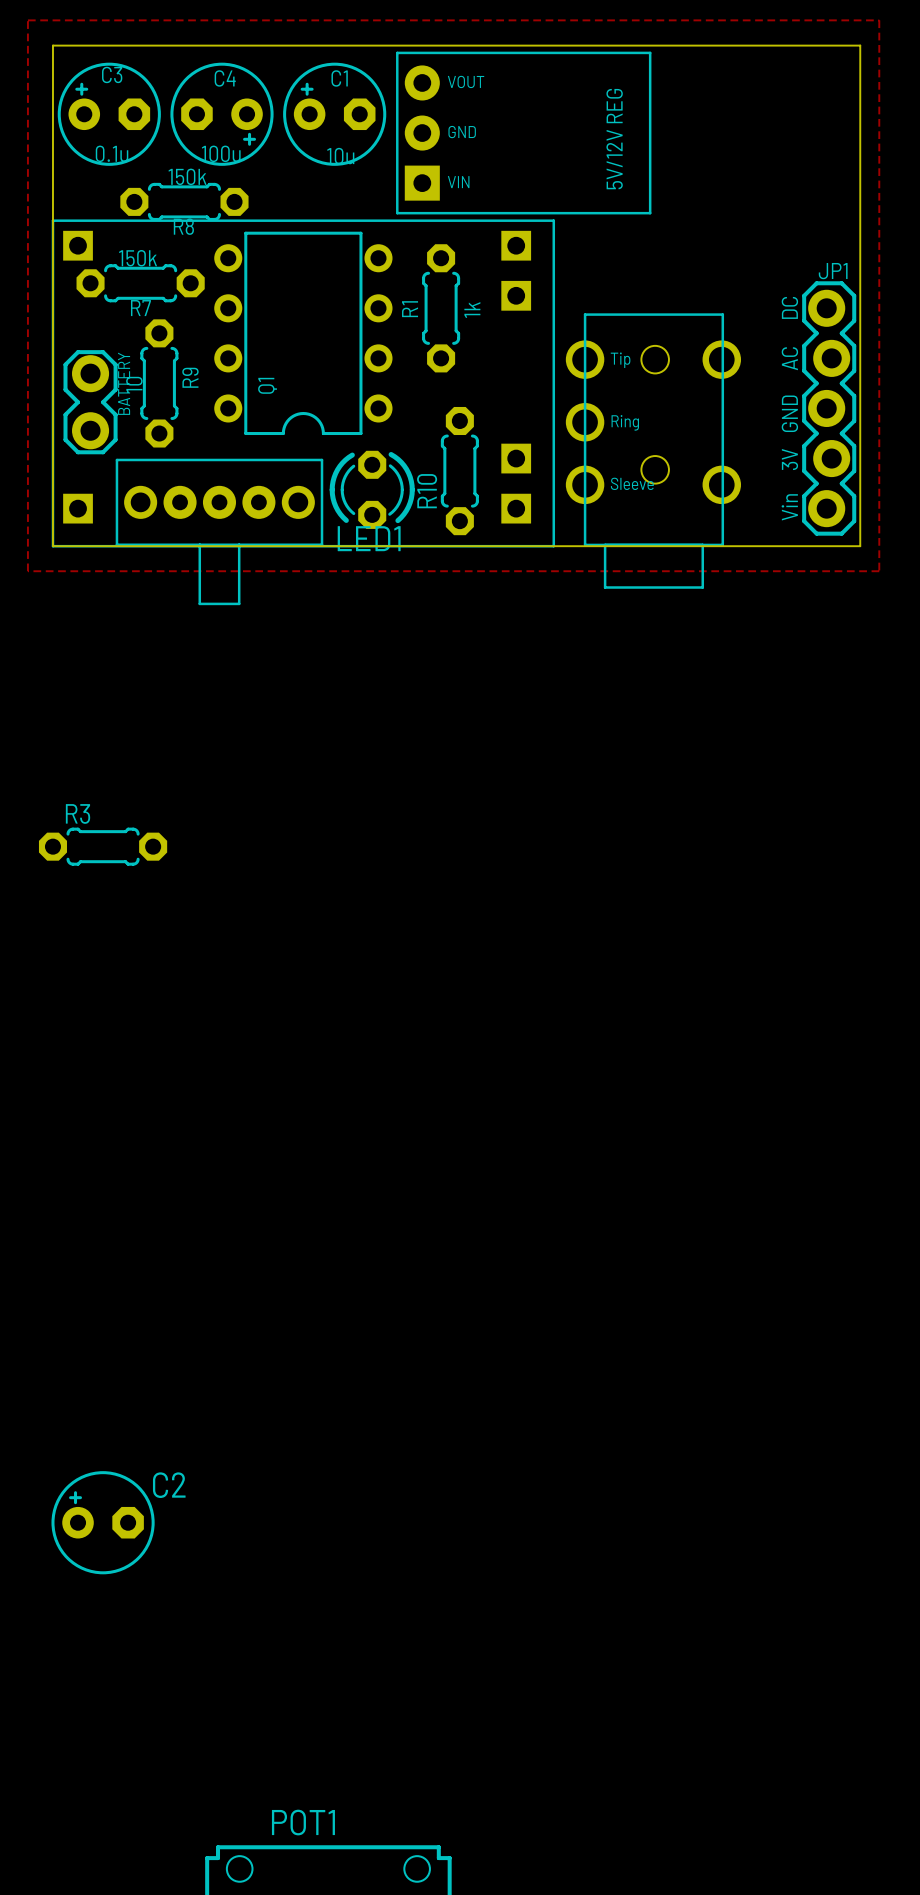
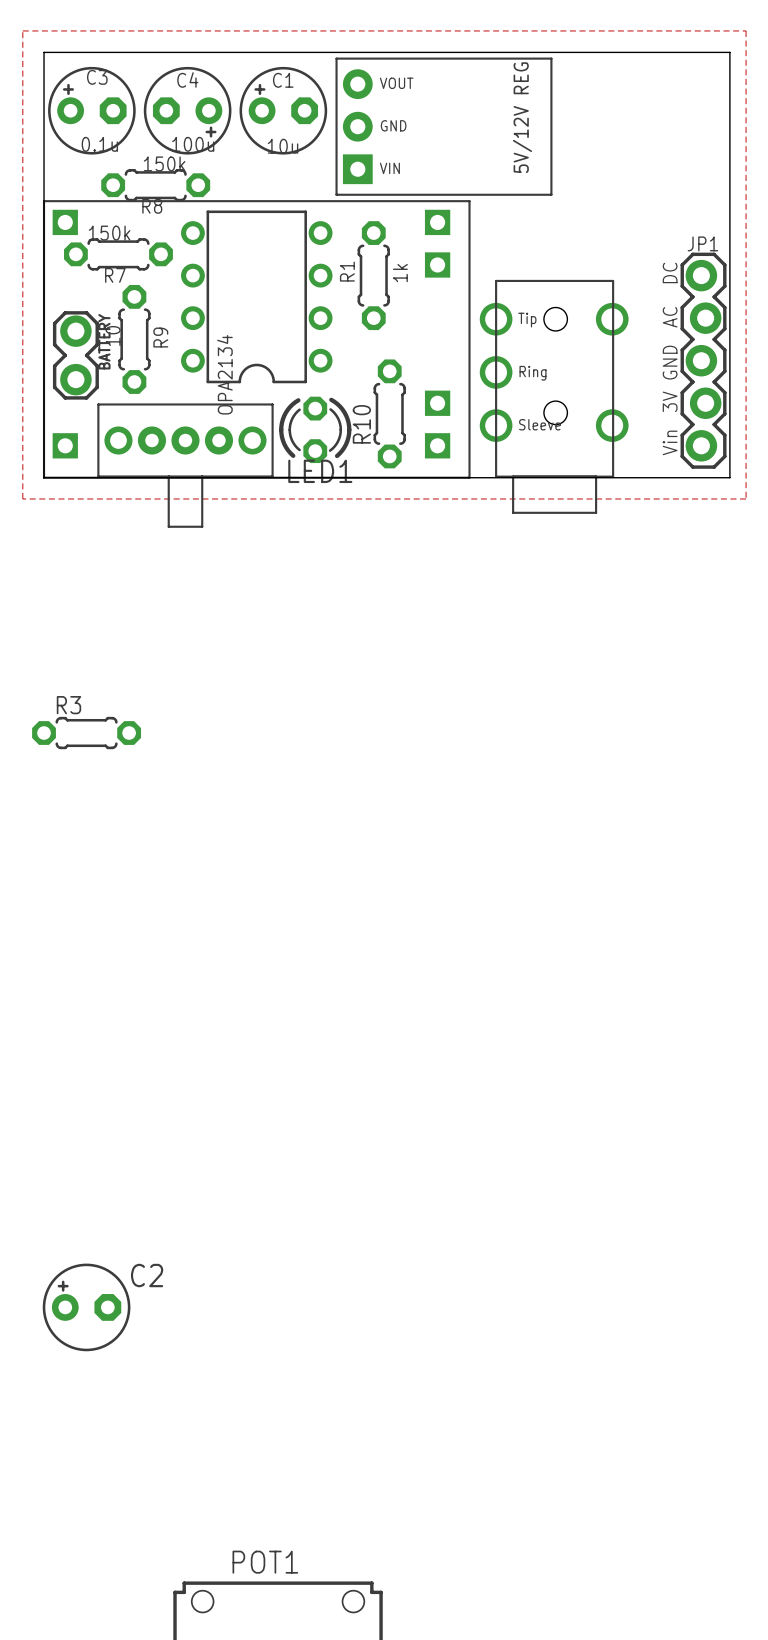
Q1 name: Q1 (267, 385) -> OPA2134 (224, 374)

